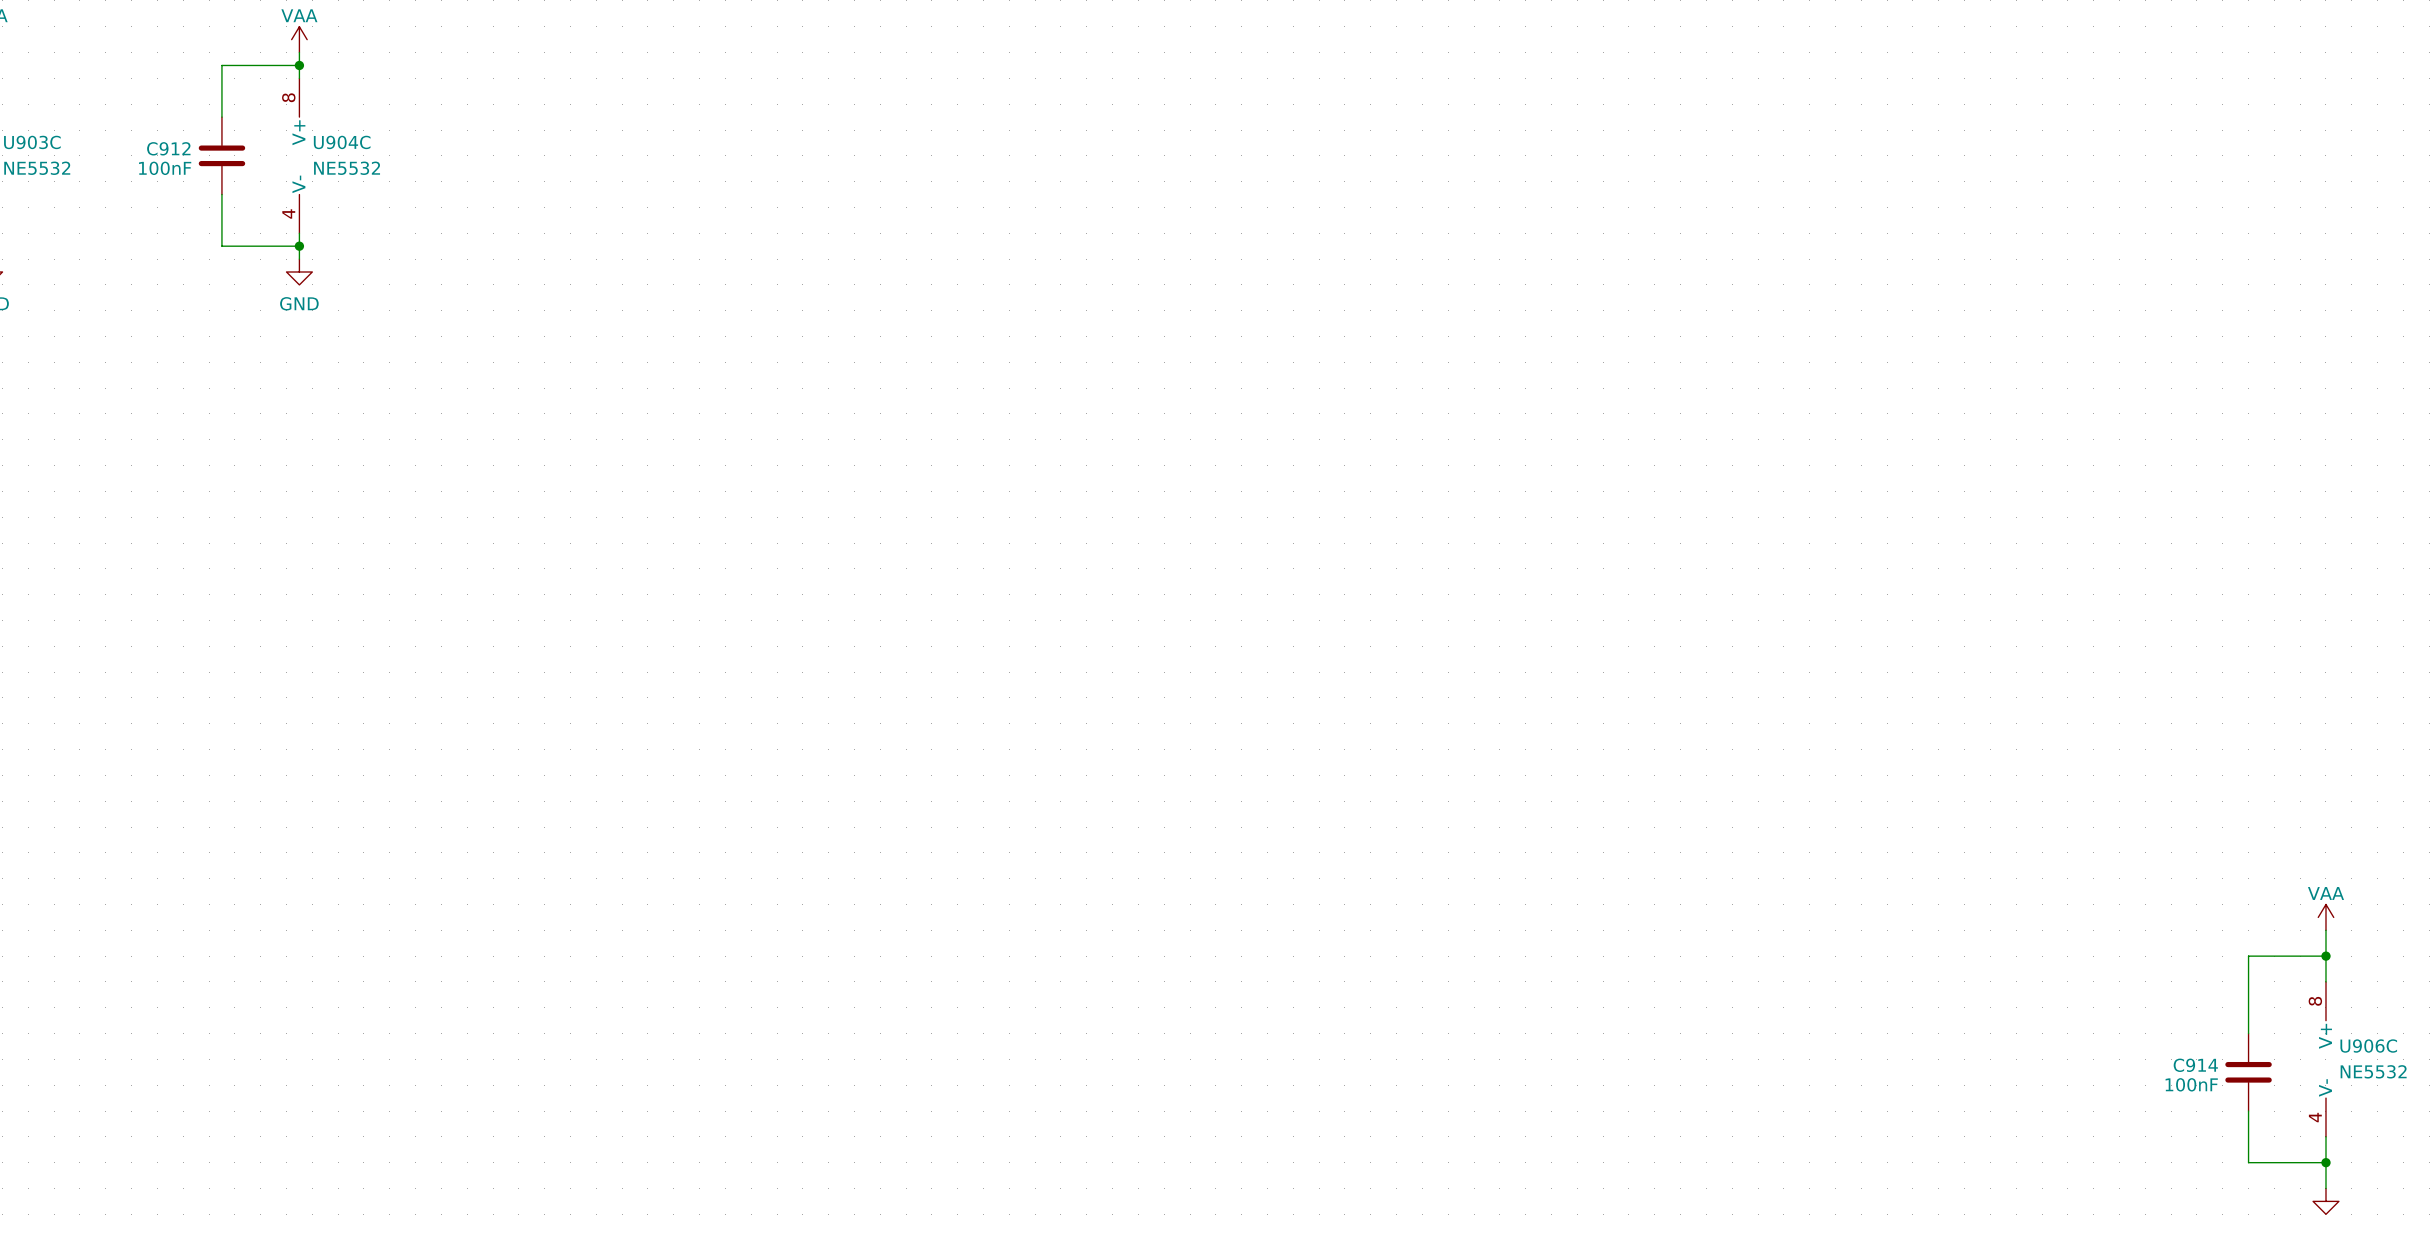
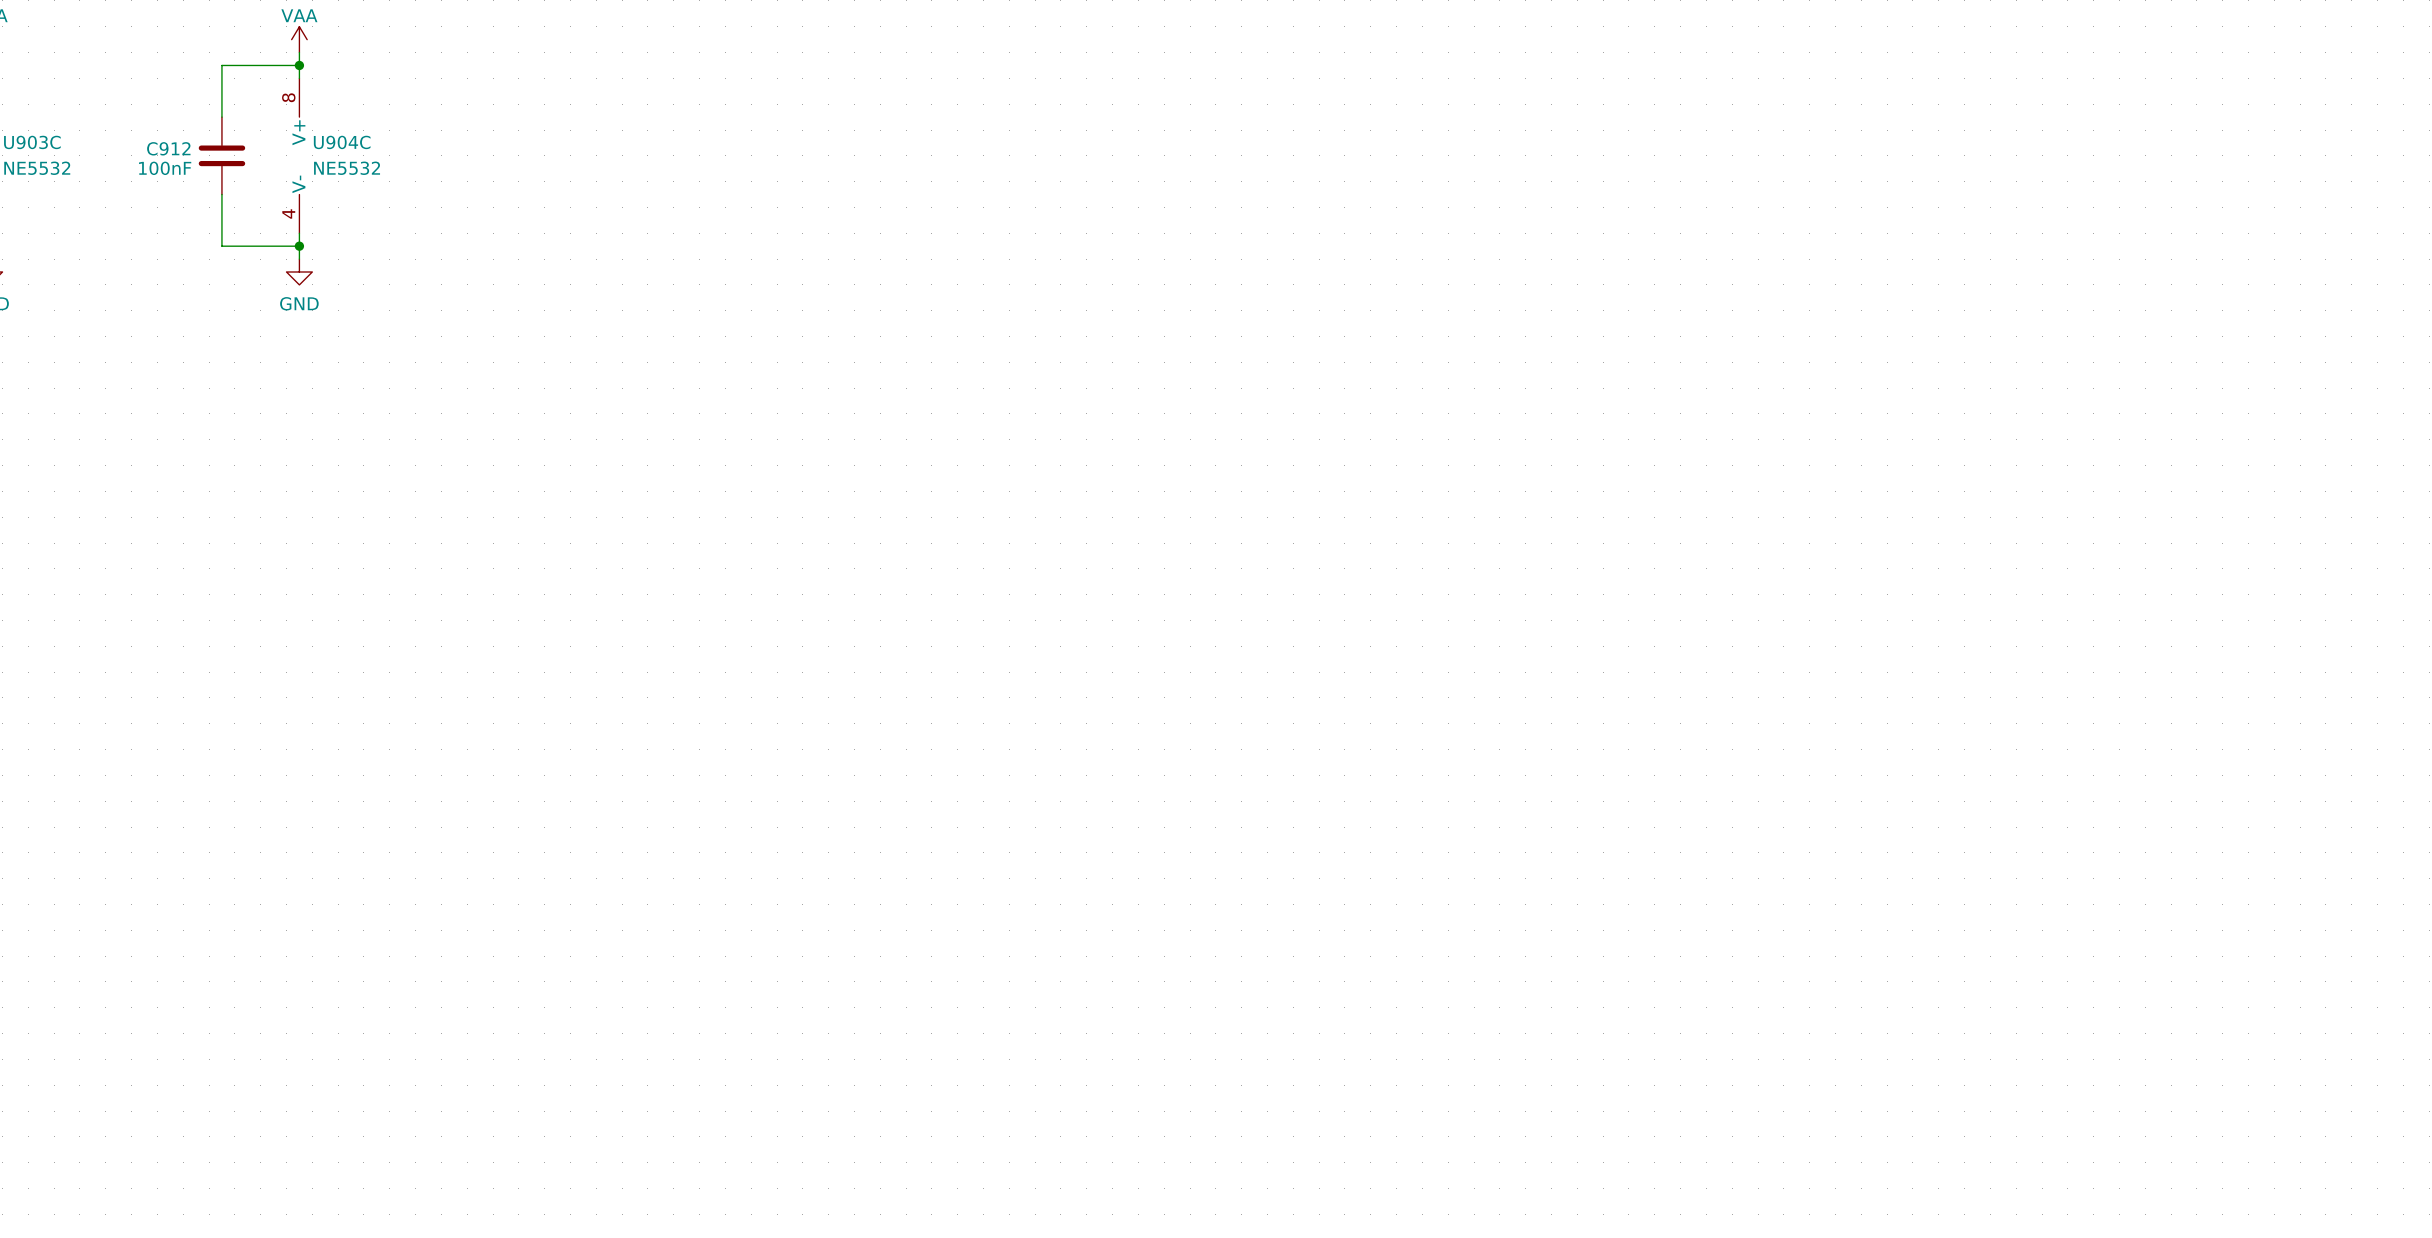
power symbol: VAA (2325, 917) -> none
wire: (2325, 930) (2325, 981) -> none
wire: (2325, 956) (2248, 956) (2248, 1033) -> none
junction: (2325, 956) -> none
U906C: NE5532 (2325, 1059) -> none
C914: 100nF (2248, 1072) -> none
wire: (2248, 1111) (2248, 1162) (2325, 1162) -> none
wire: (2325, 1136) (2325, 1188) -> none
junction: (2325, 1162) -> none
power symbol: (2325, 1201) -> none

